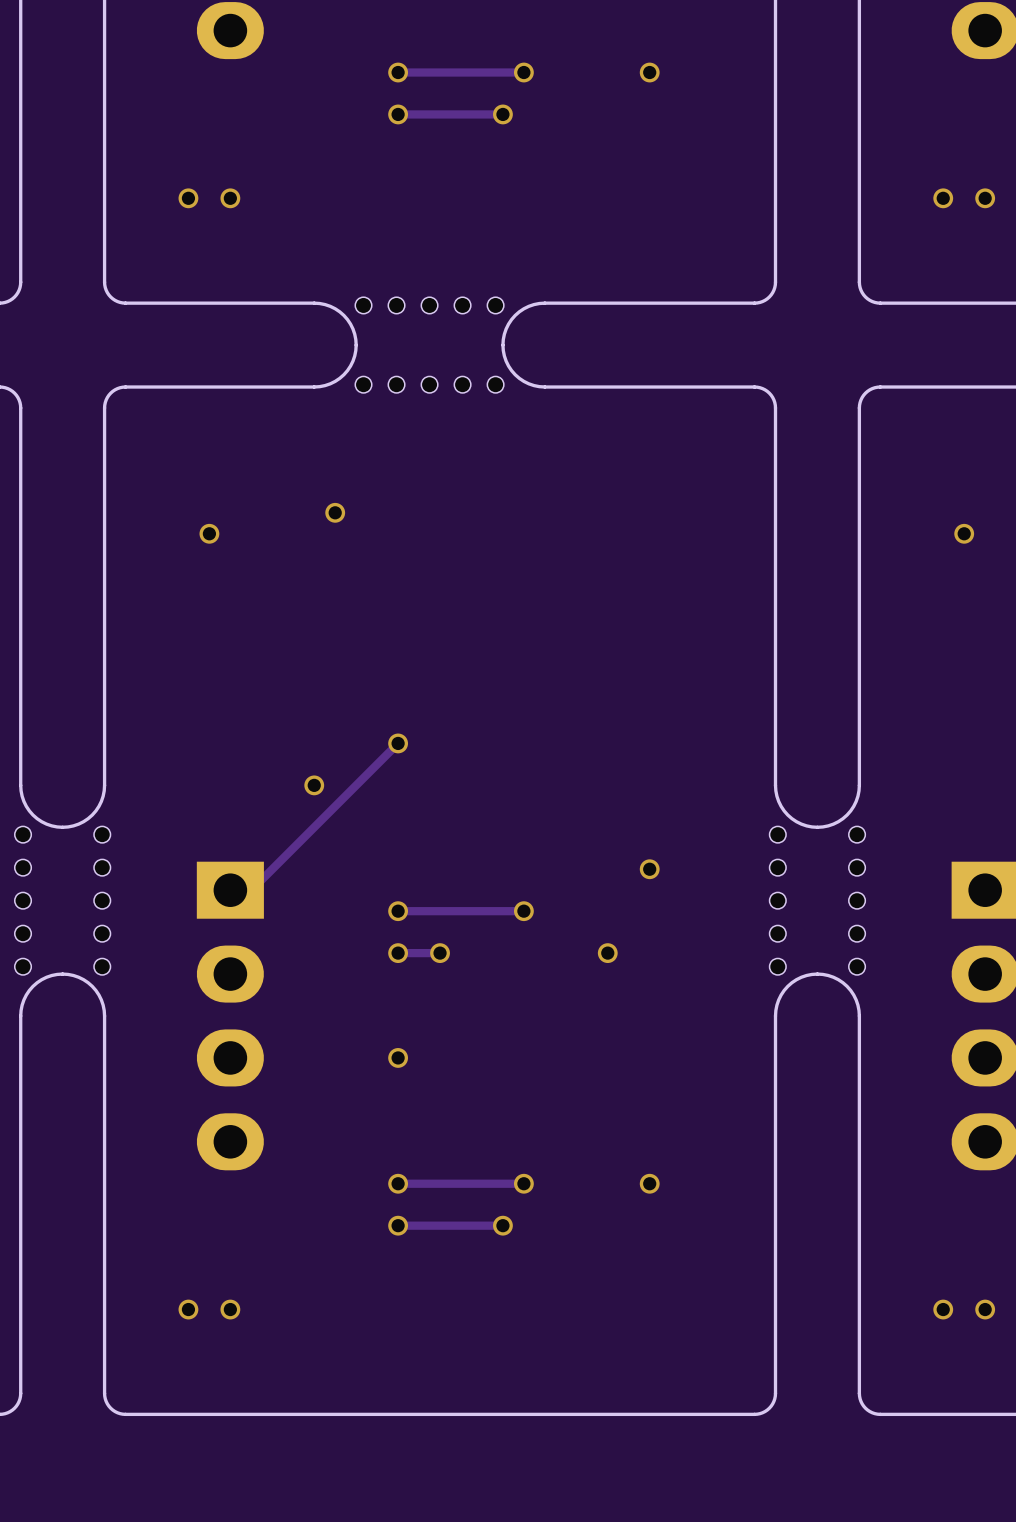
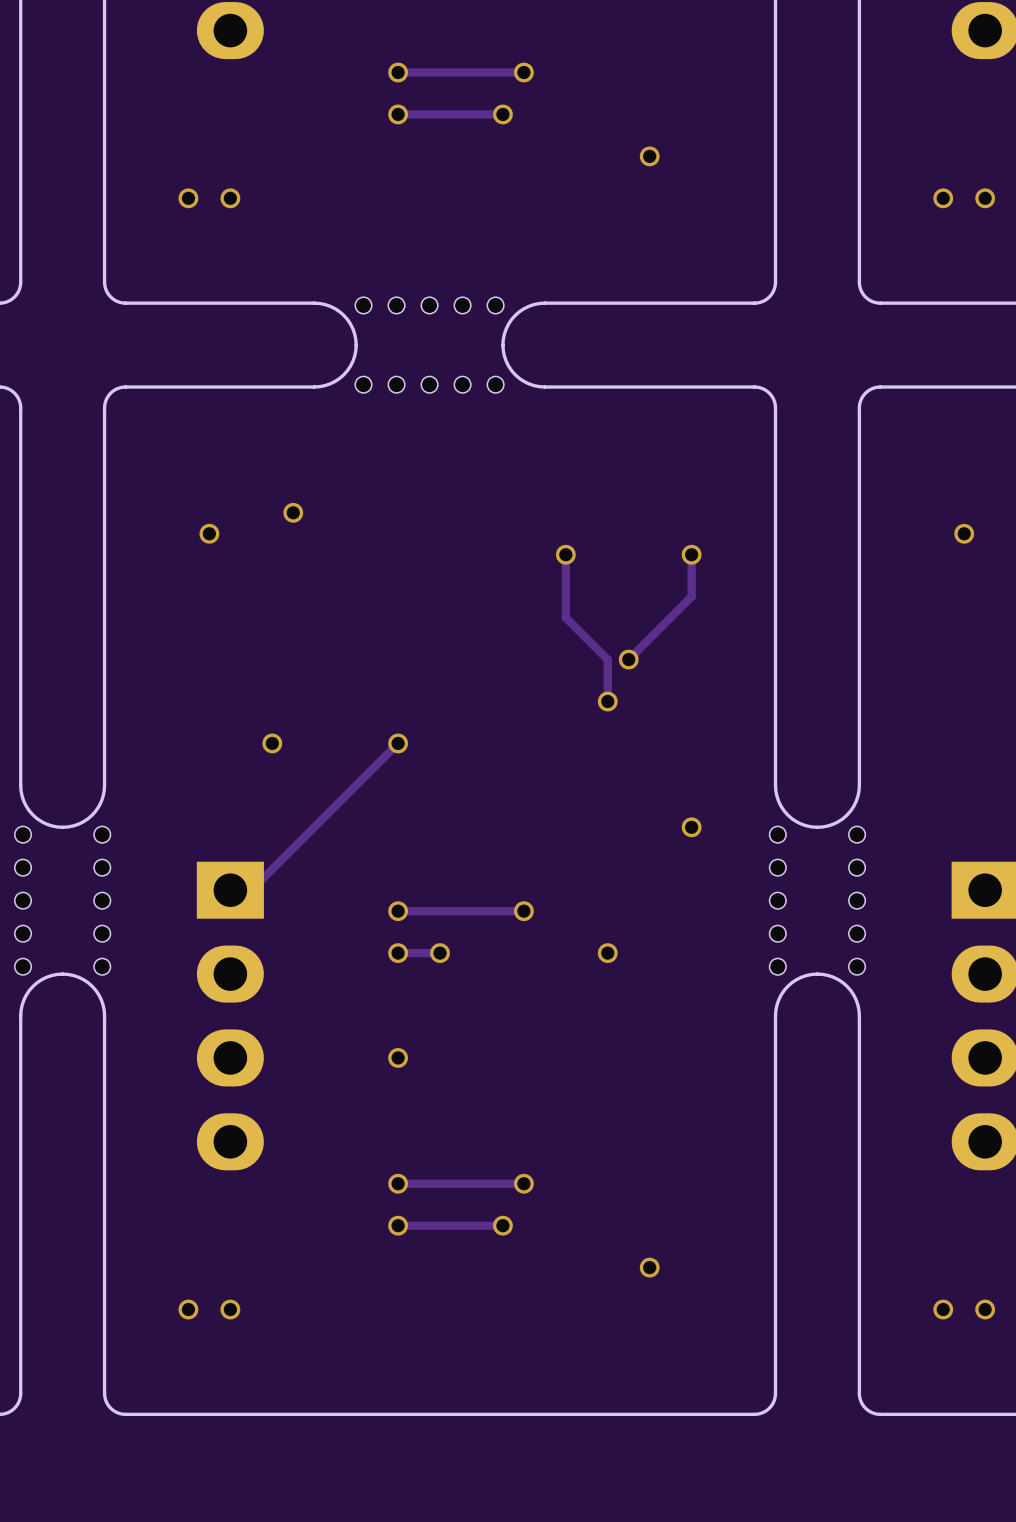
via position: (649, 72) -> (649, 156)
via position: (335, 512) -> (293, 512)
track: none -> (565, 554) (565, 617) (607, 659) (607, 701)
via: none -> (565, 554)
track: none -> (691, 554) (691, 596) (628, 659)
via: none -> (691, 554)
via: none -> (628, 659)
via: none -> (607, 701)
via position: (314, 785) -> (272, 743)
via position: (649, 869) -> (691, 827)
via position: (649, 1183) -> (649, 1267)

